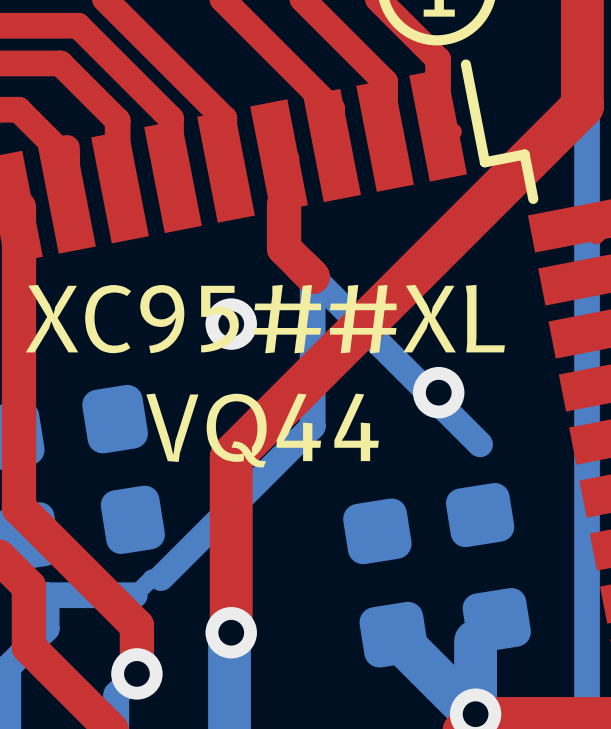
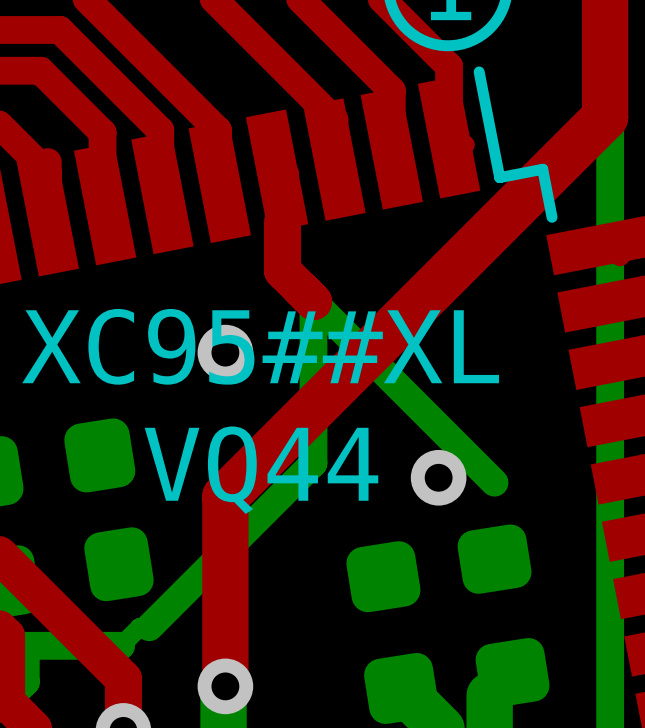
via position: (438, 392) -> (438, 477)

